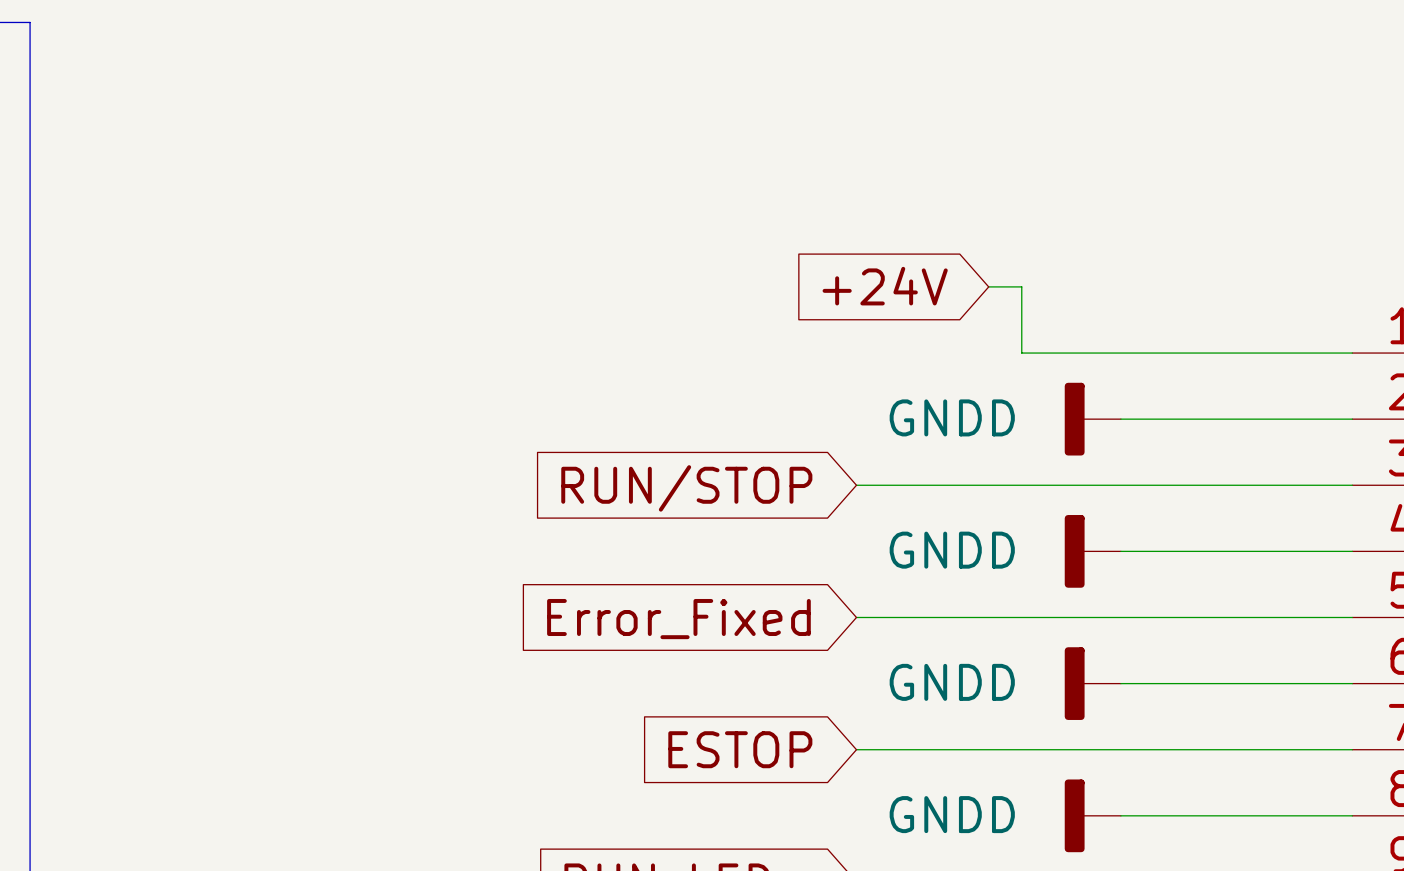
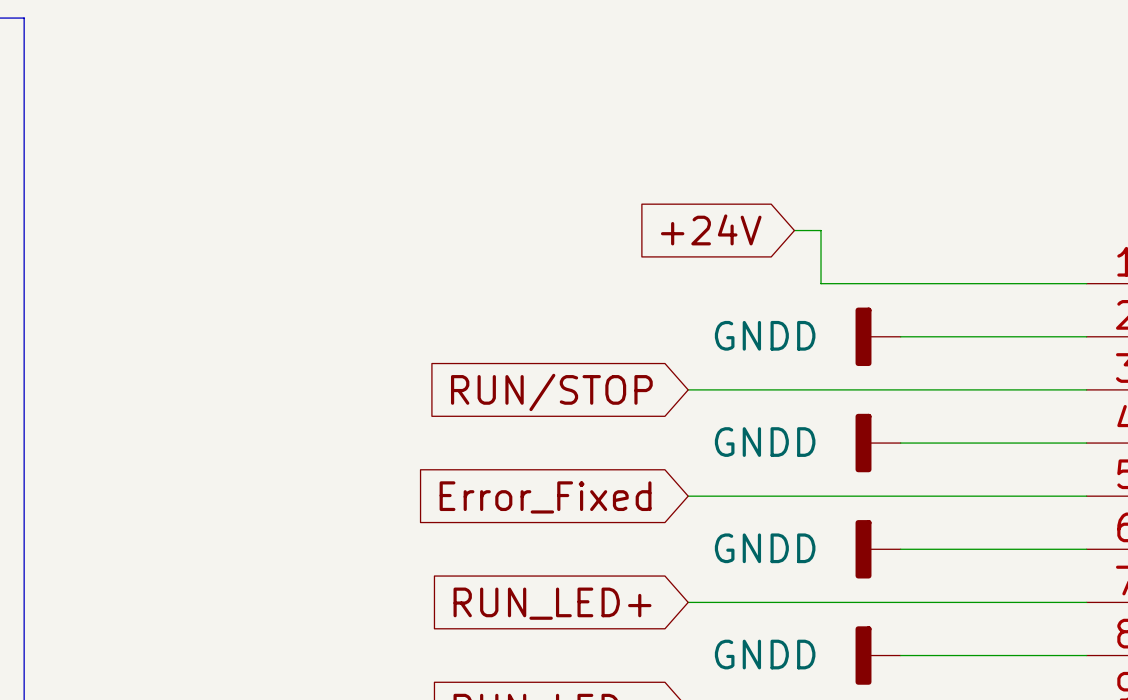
global label: ESTOP (740, 749) -> RUN_LED+ (552, 603)

